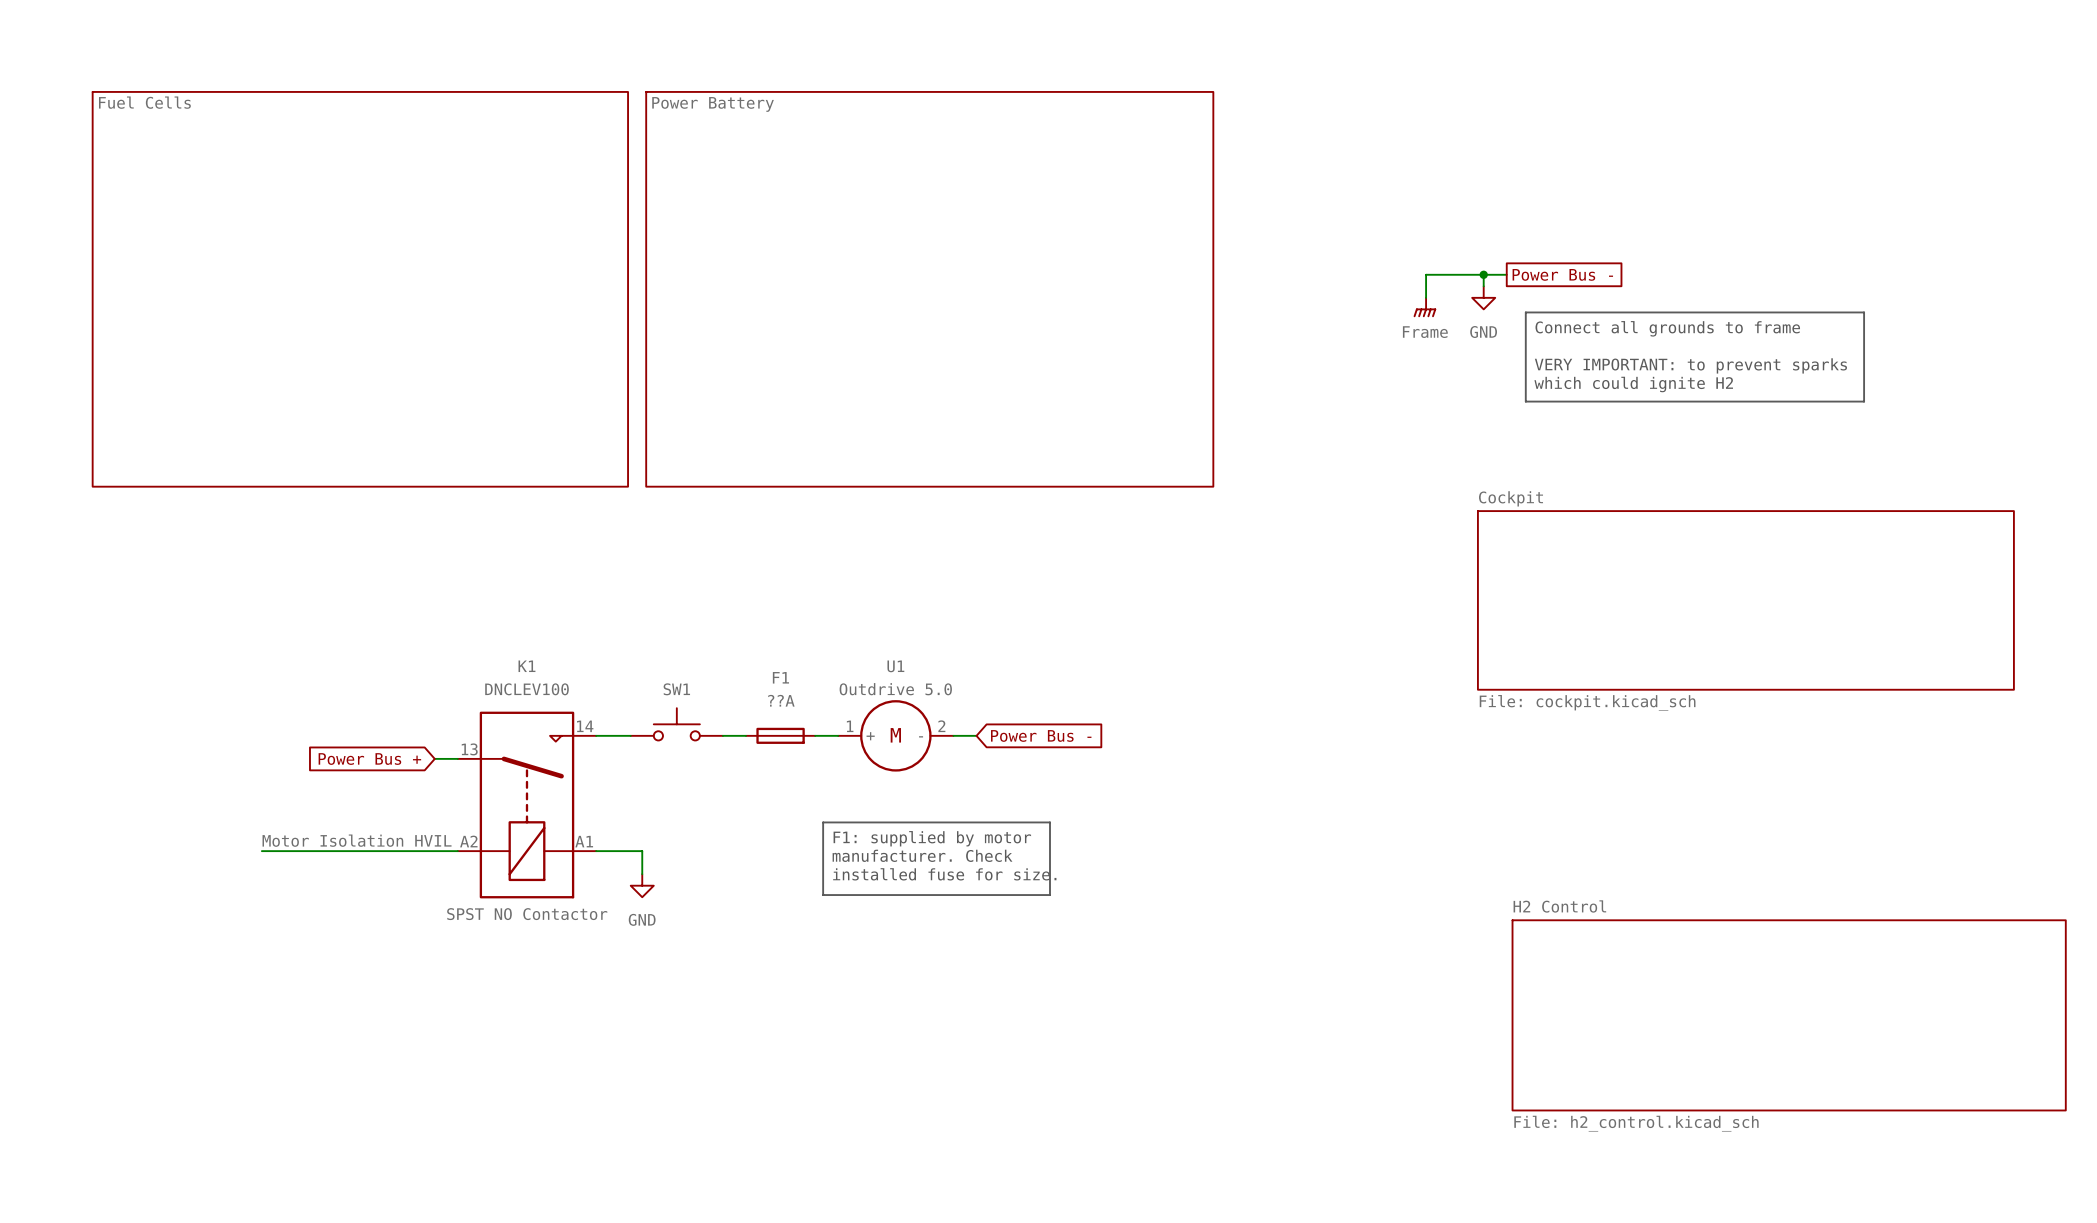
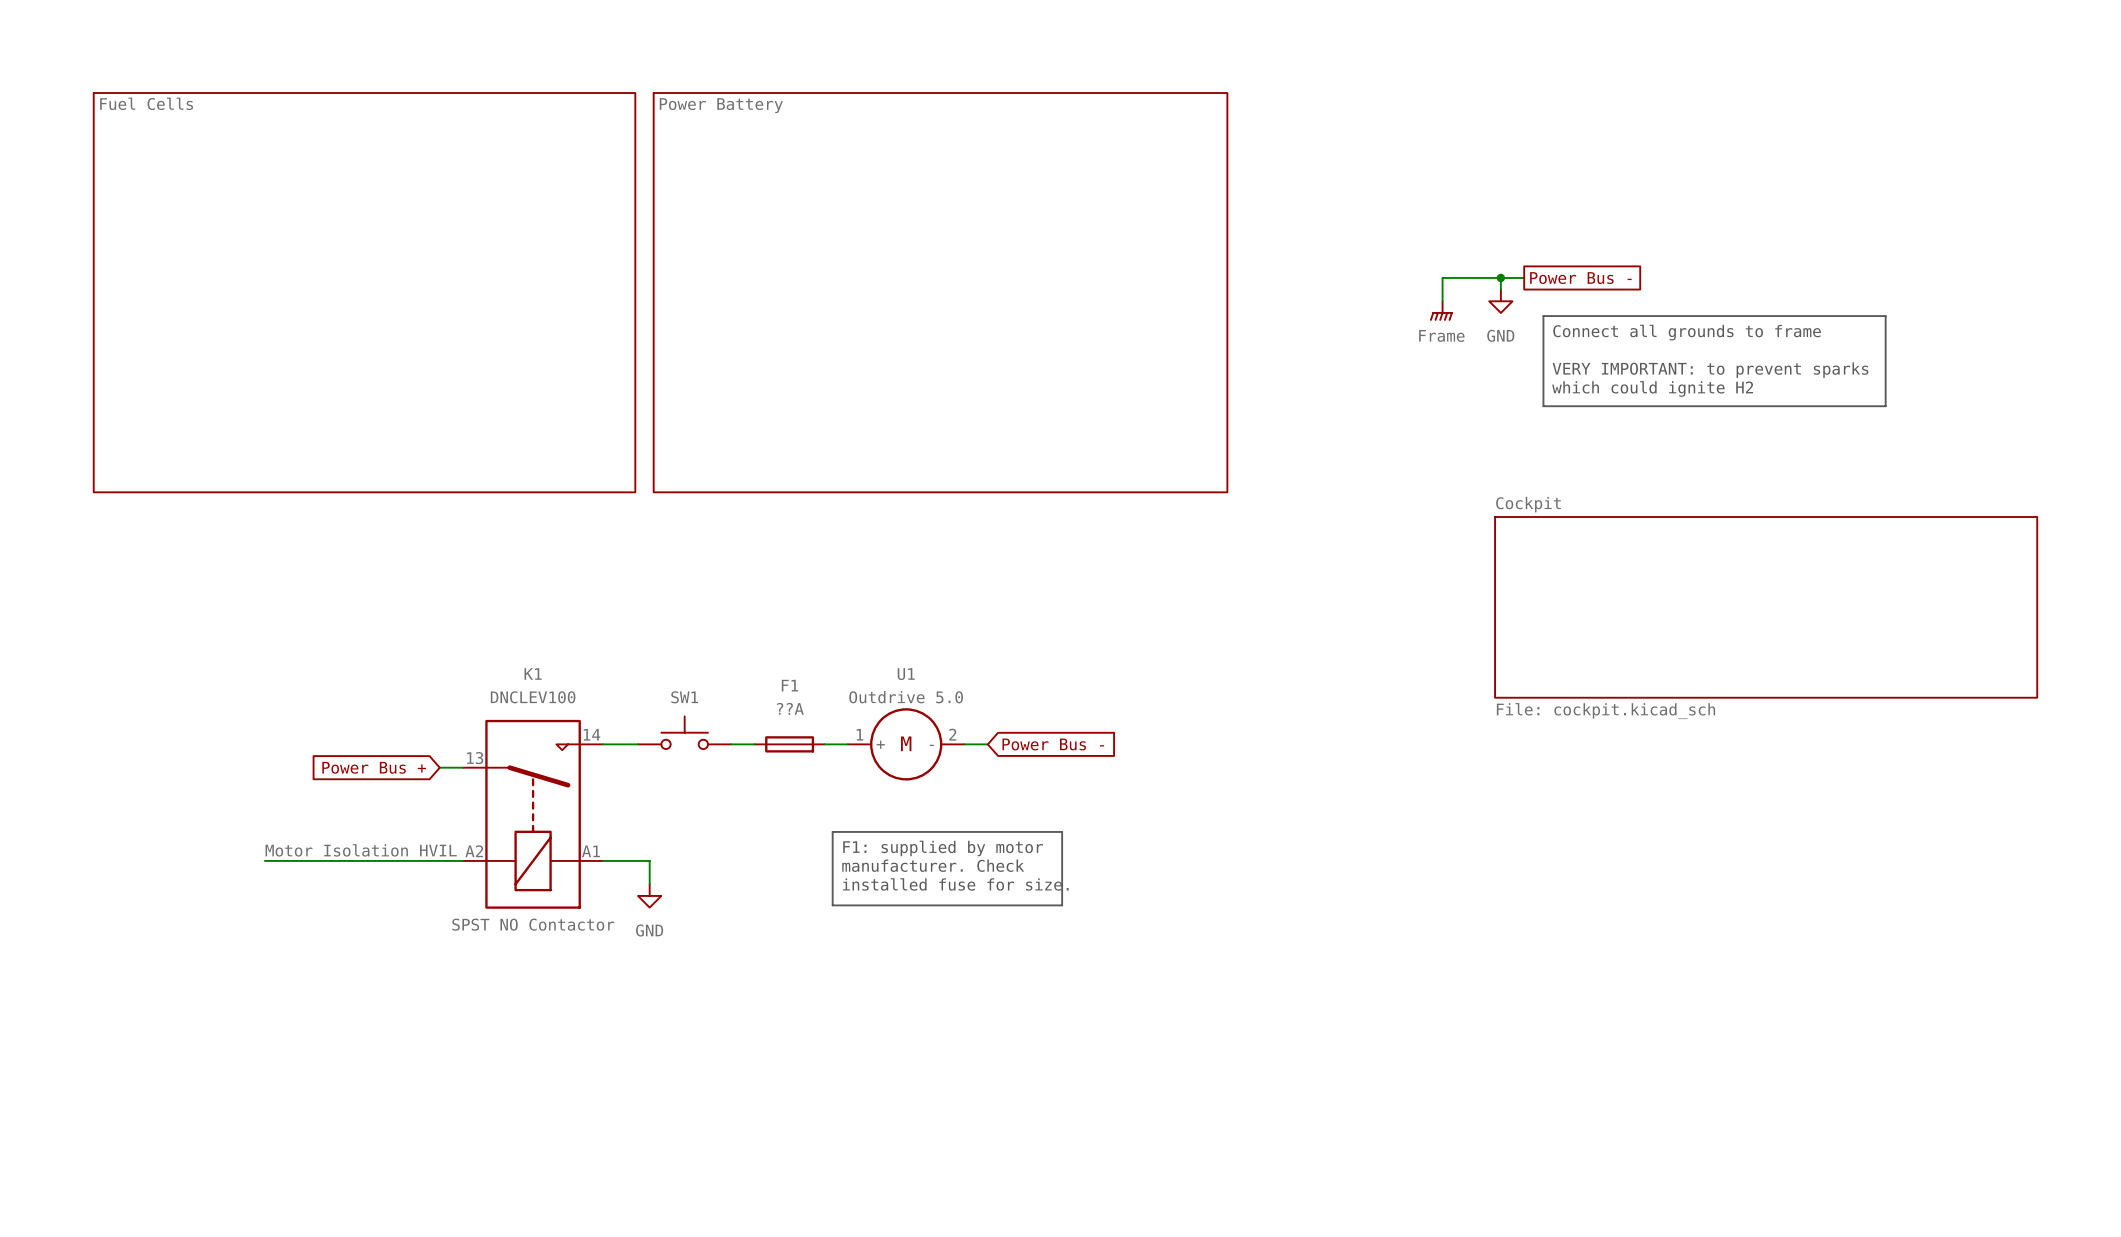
sheet H2 Control: File: h2_control.kicad_sch (1789, 1015) -> none

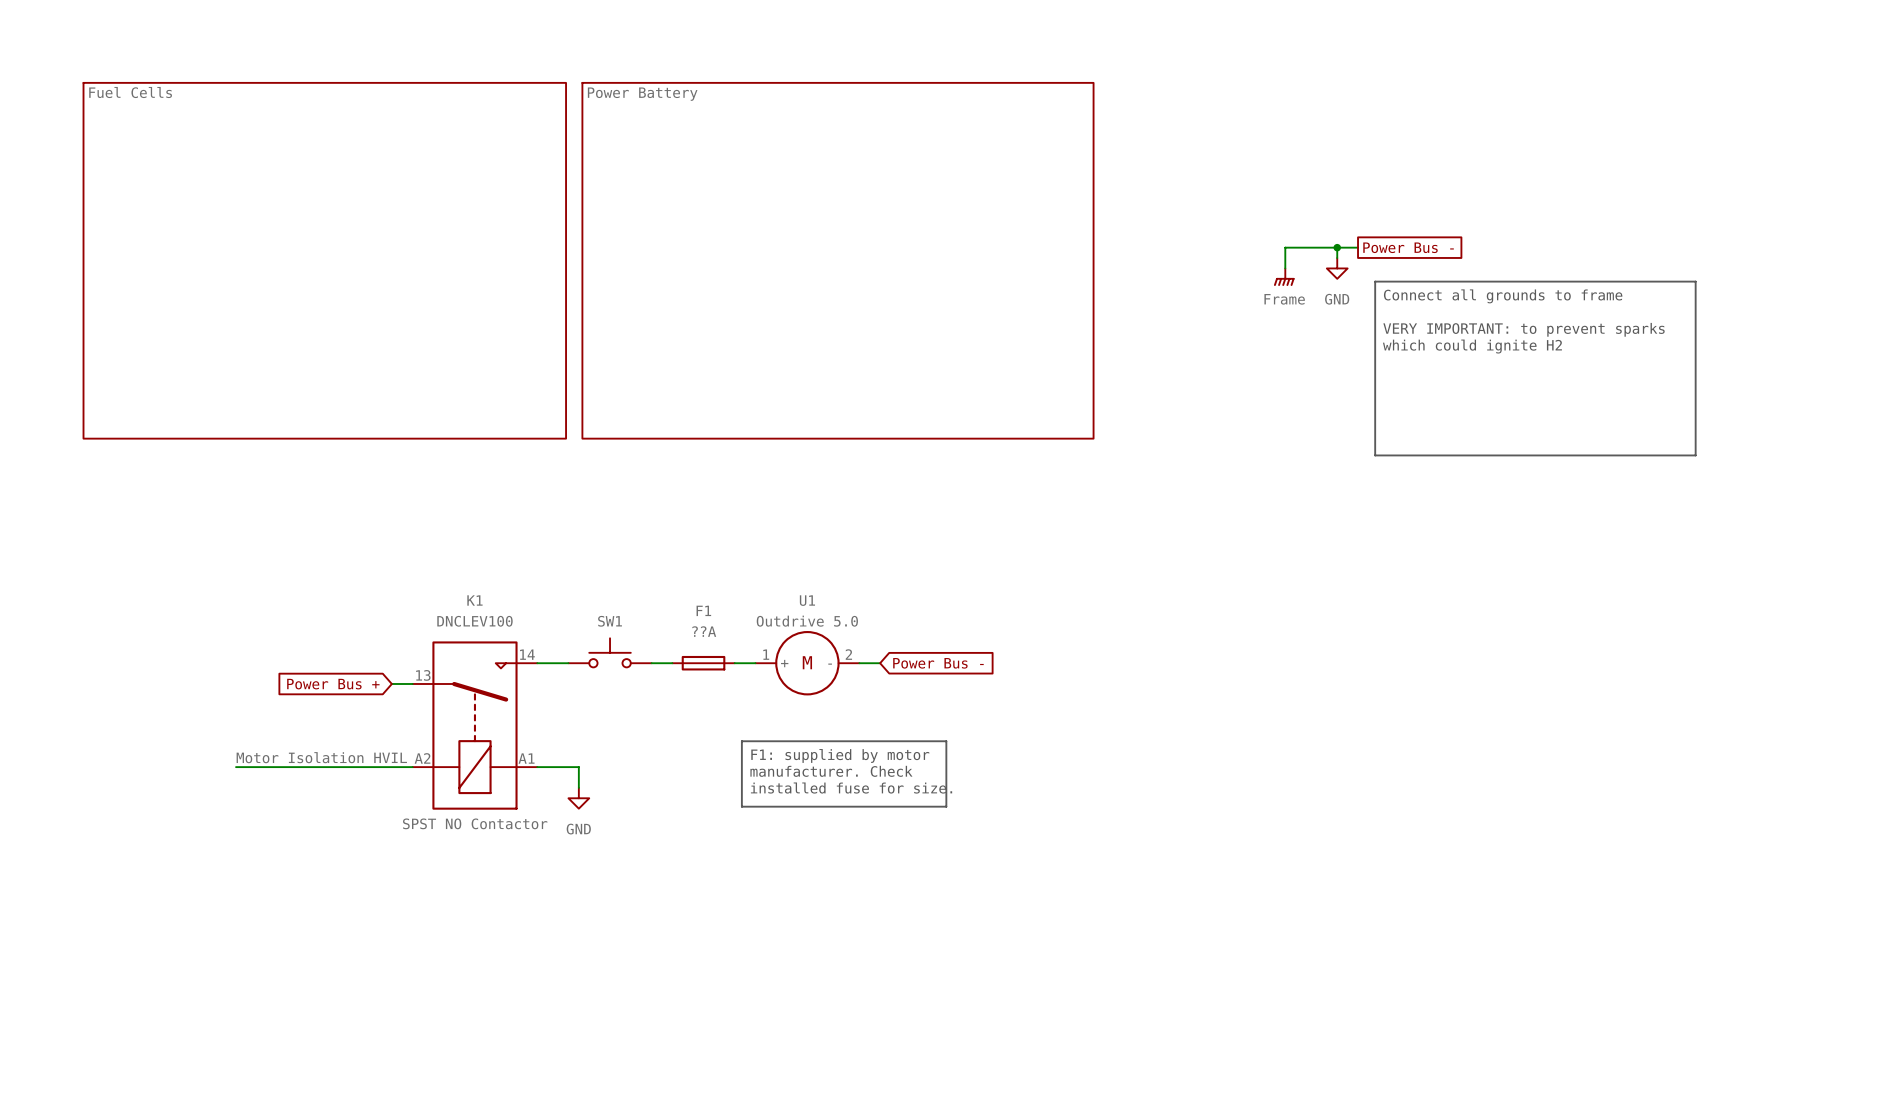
line: (1885, 316) (1885, 406) (1543, 406) -> (1680, 281) (1695, 281) (1695, 455) (1375, 455) (1375, 361)
sheet Cockpit: File: cockpit.kicad_sch (1766, 607) -> none

